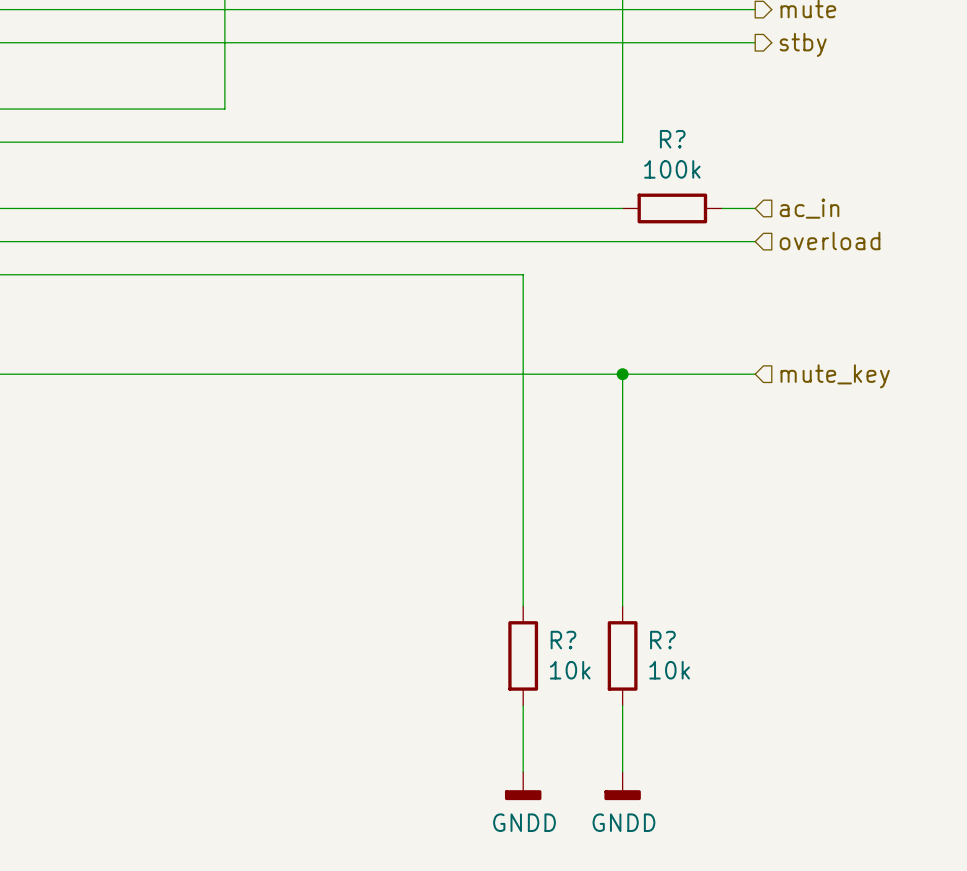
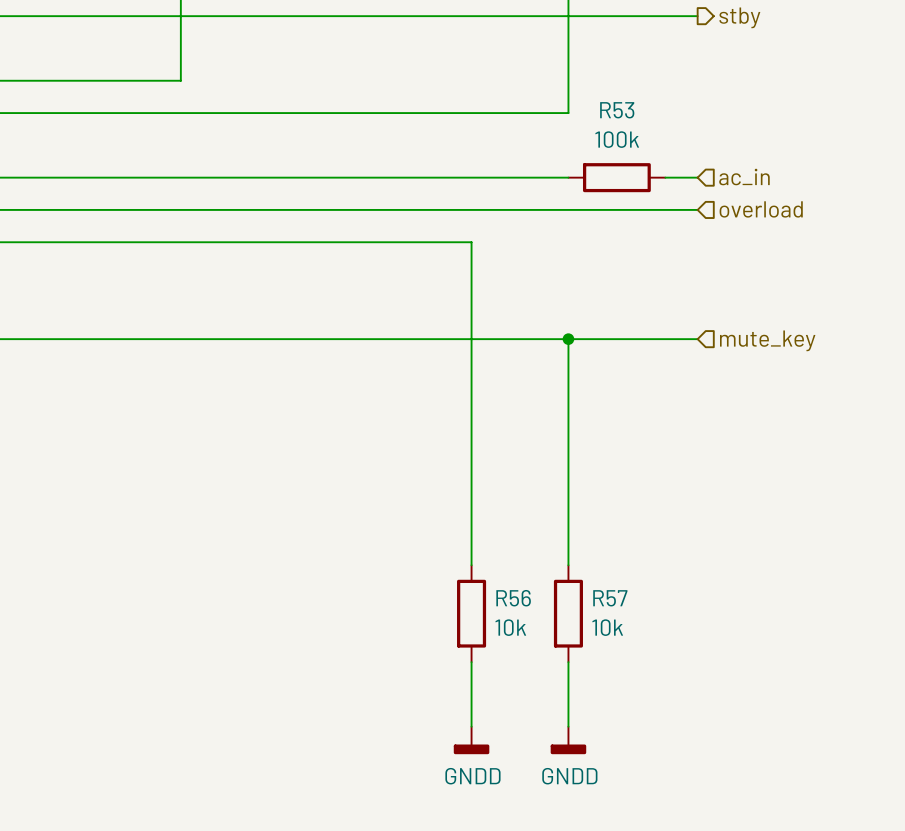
R? name: R? (672, 139) -> R53 (617, 110)
R? name: R? (563, 640) -> R56 (513, 598)
R? name: R? (662, 640) -> R57 (610, 598)

